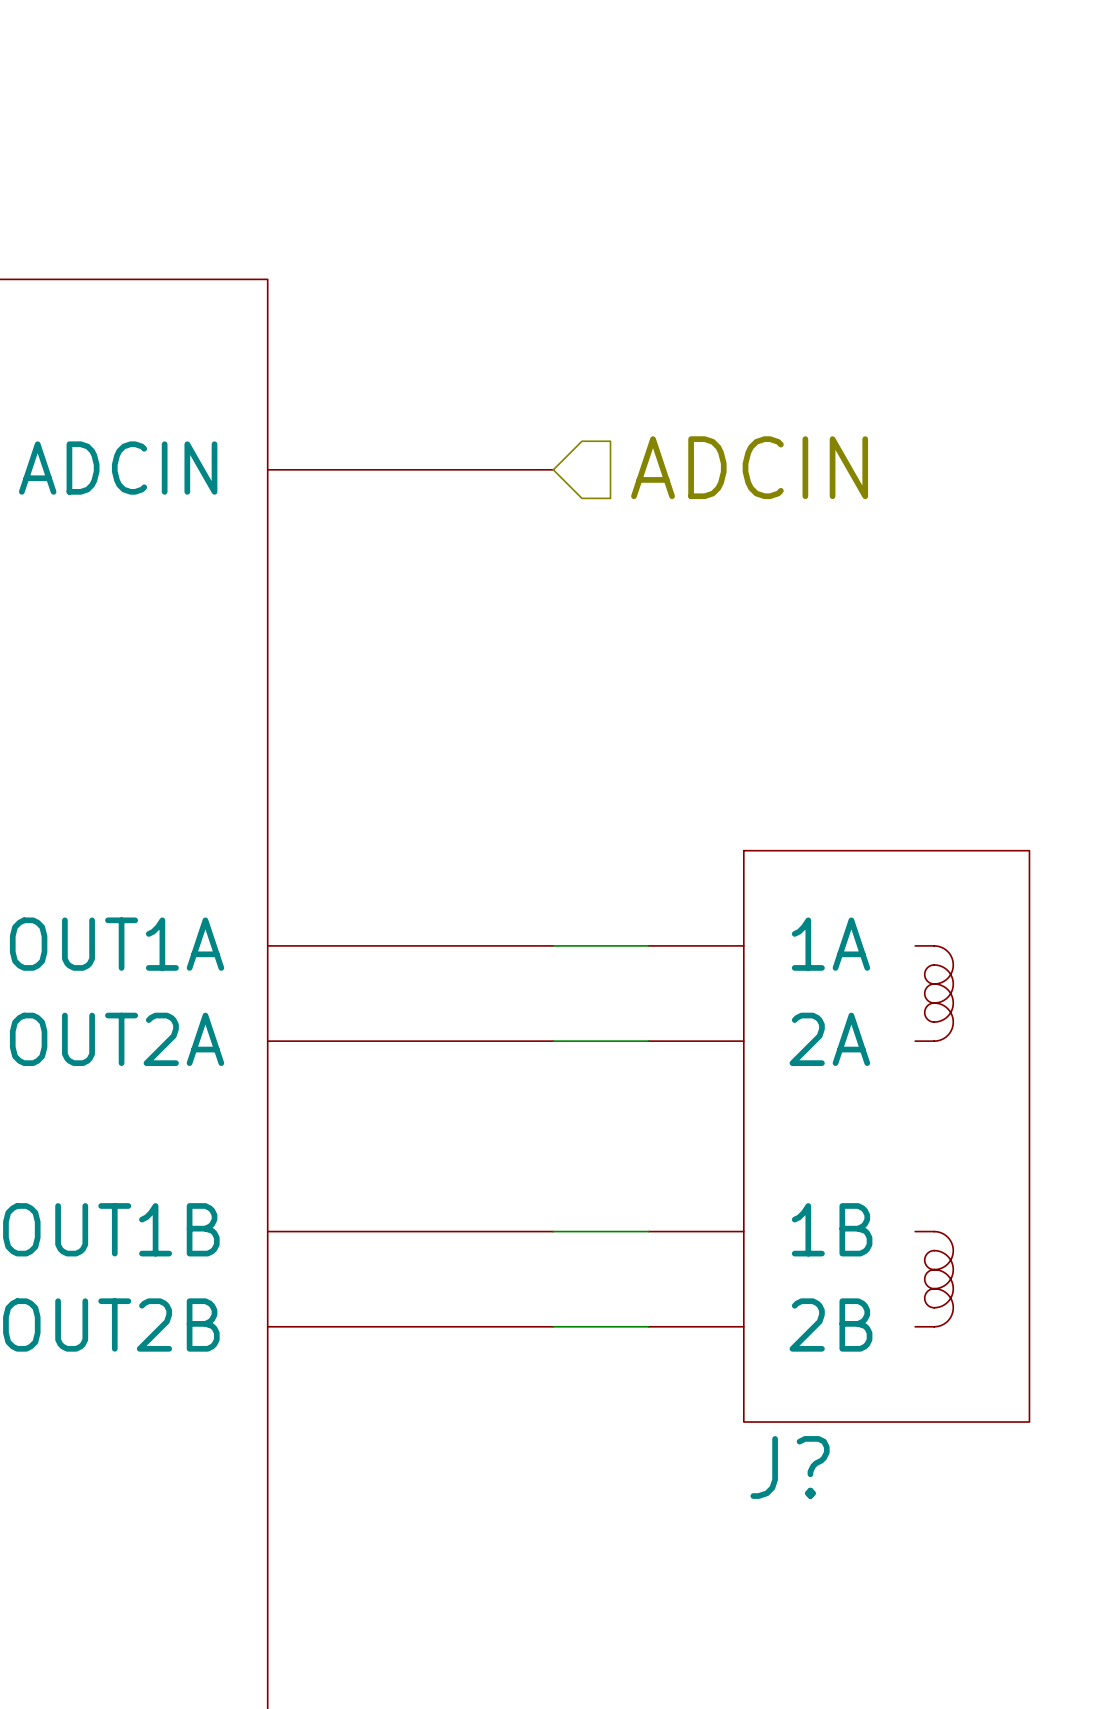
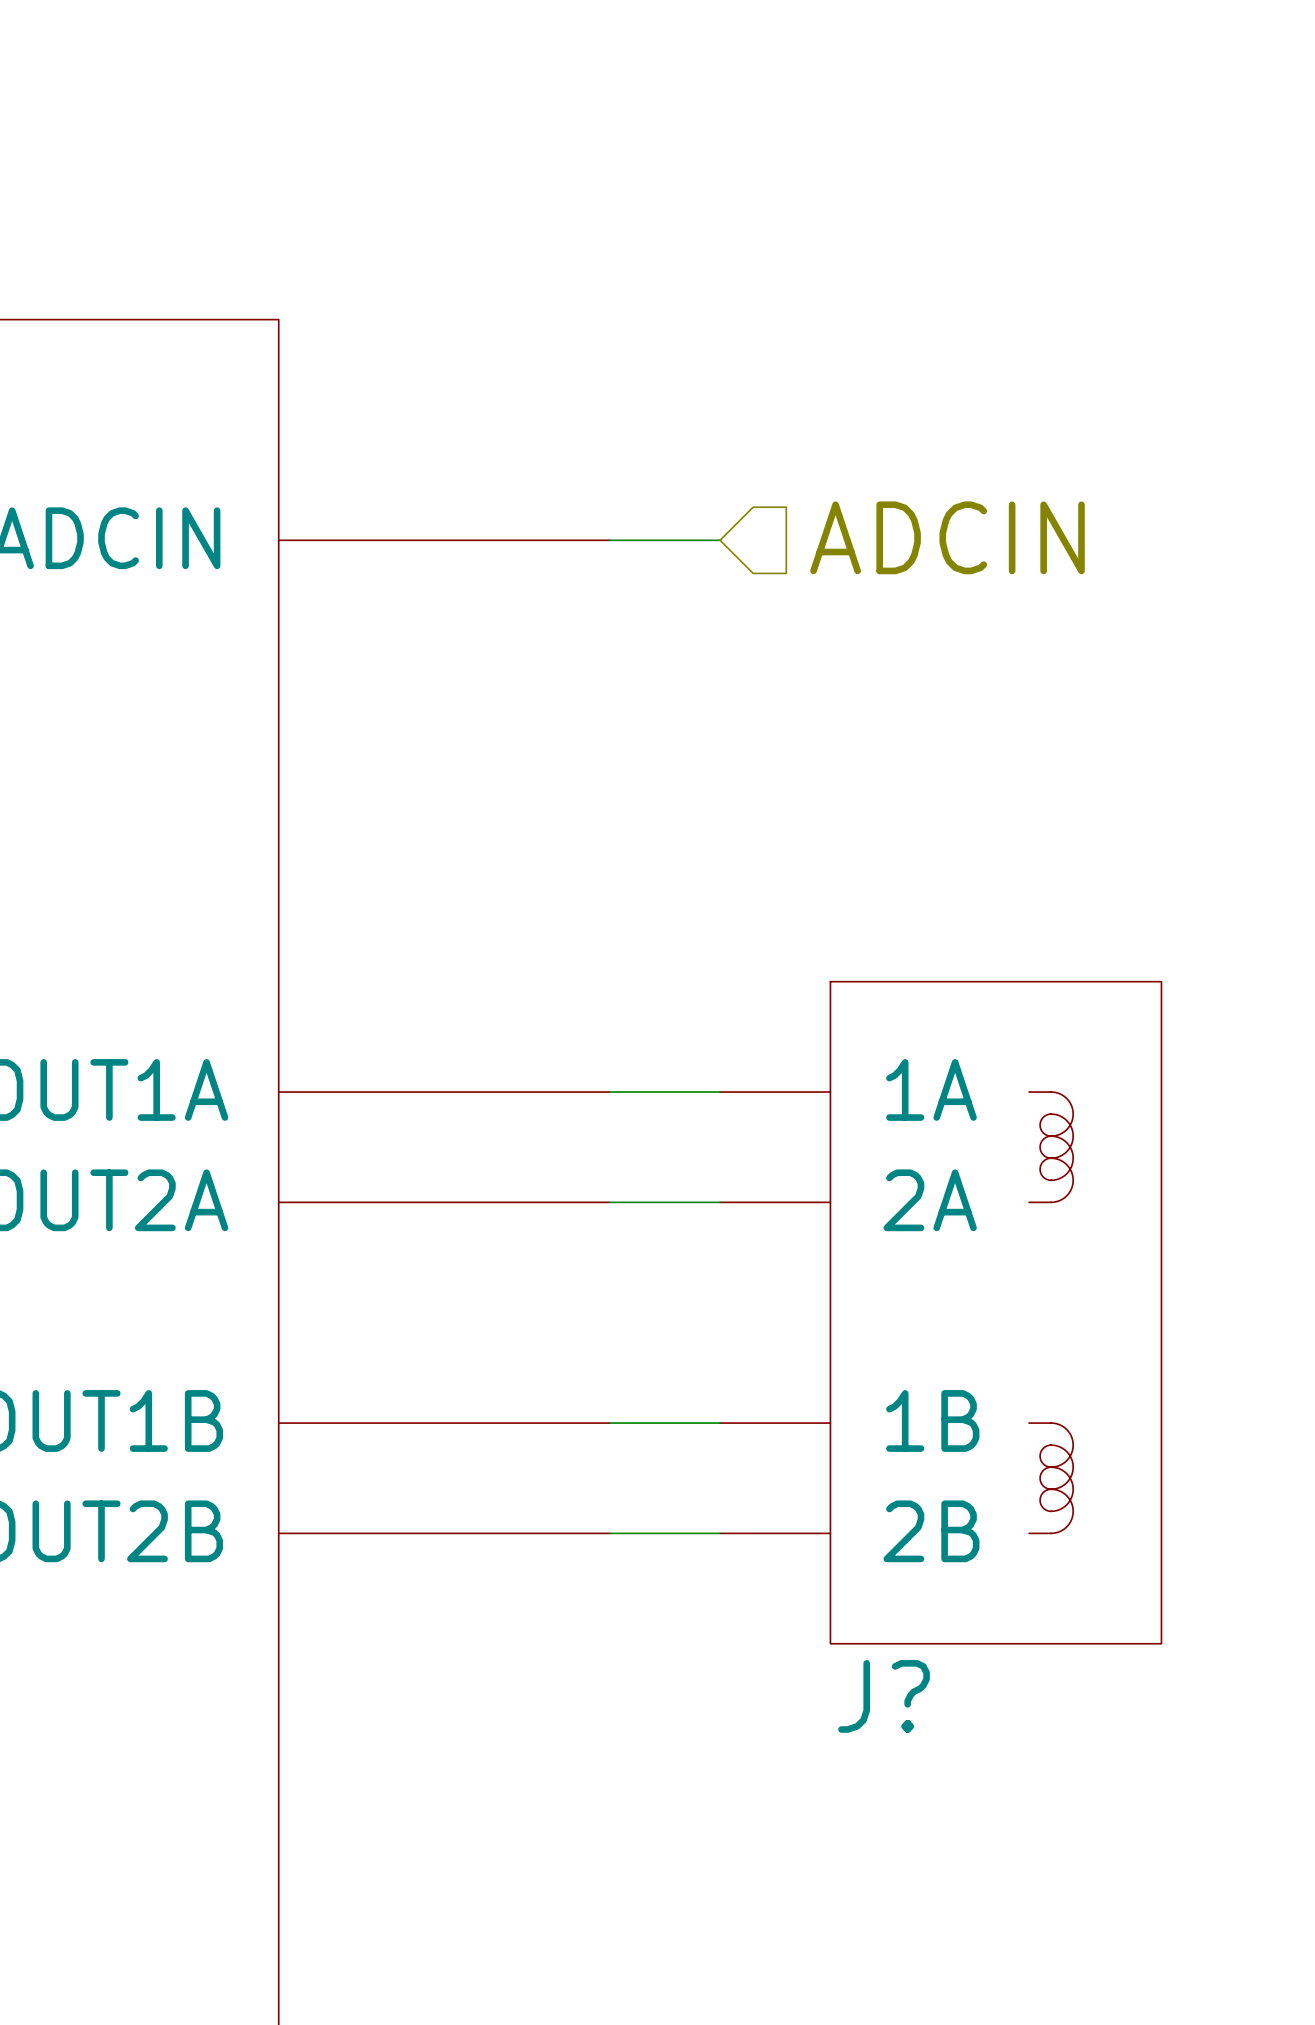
hierarchical label position: ADCIN (749, 467) -> ADCIN (947, 537)
wire: none -> (609, 540) (720, 540)

